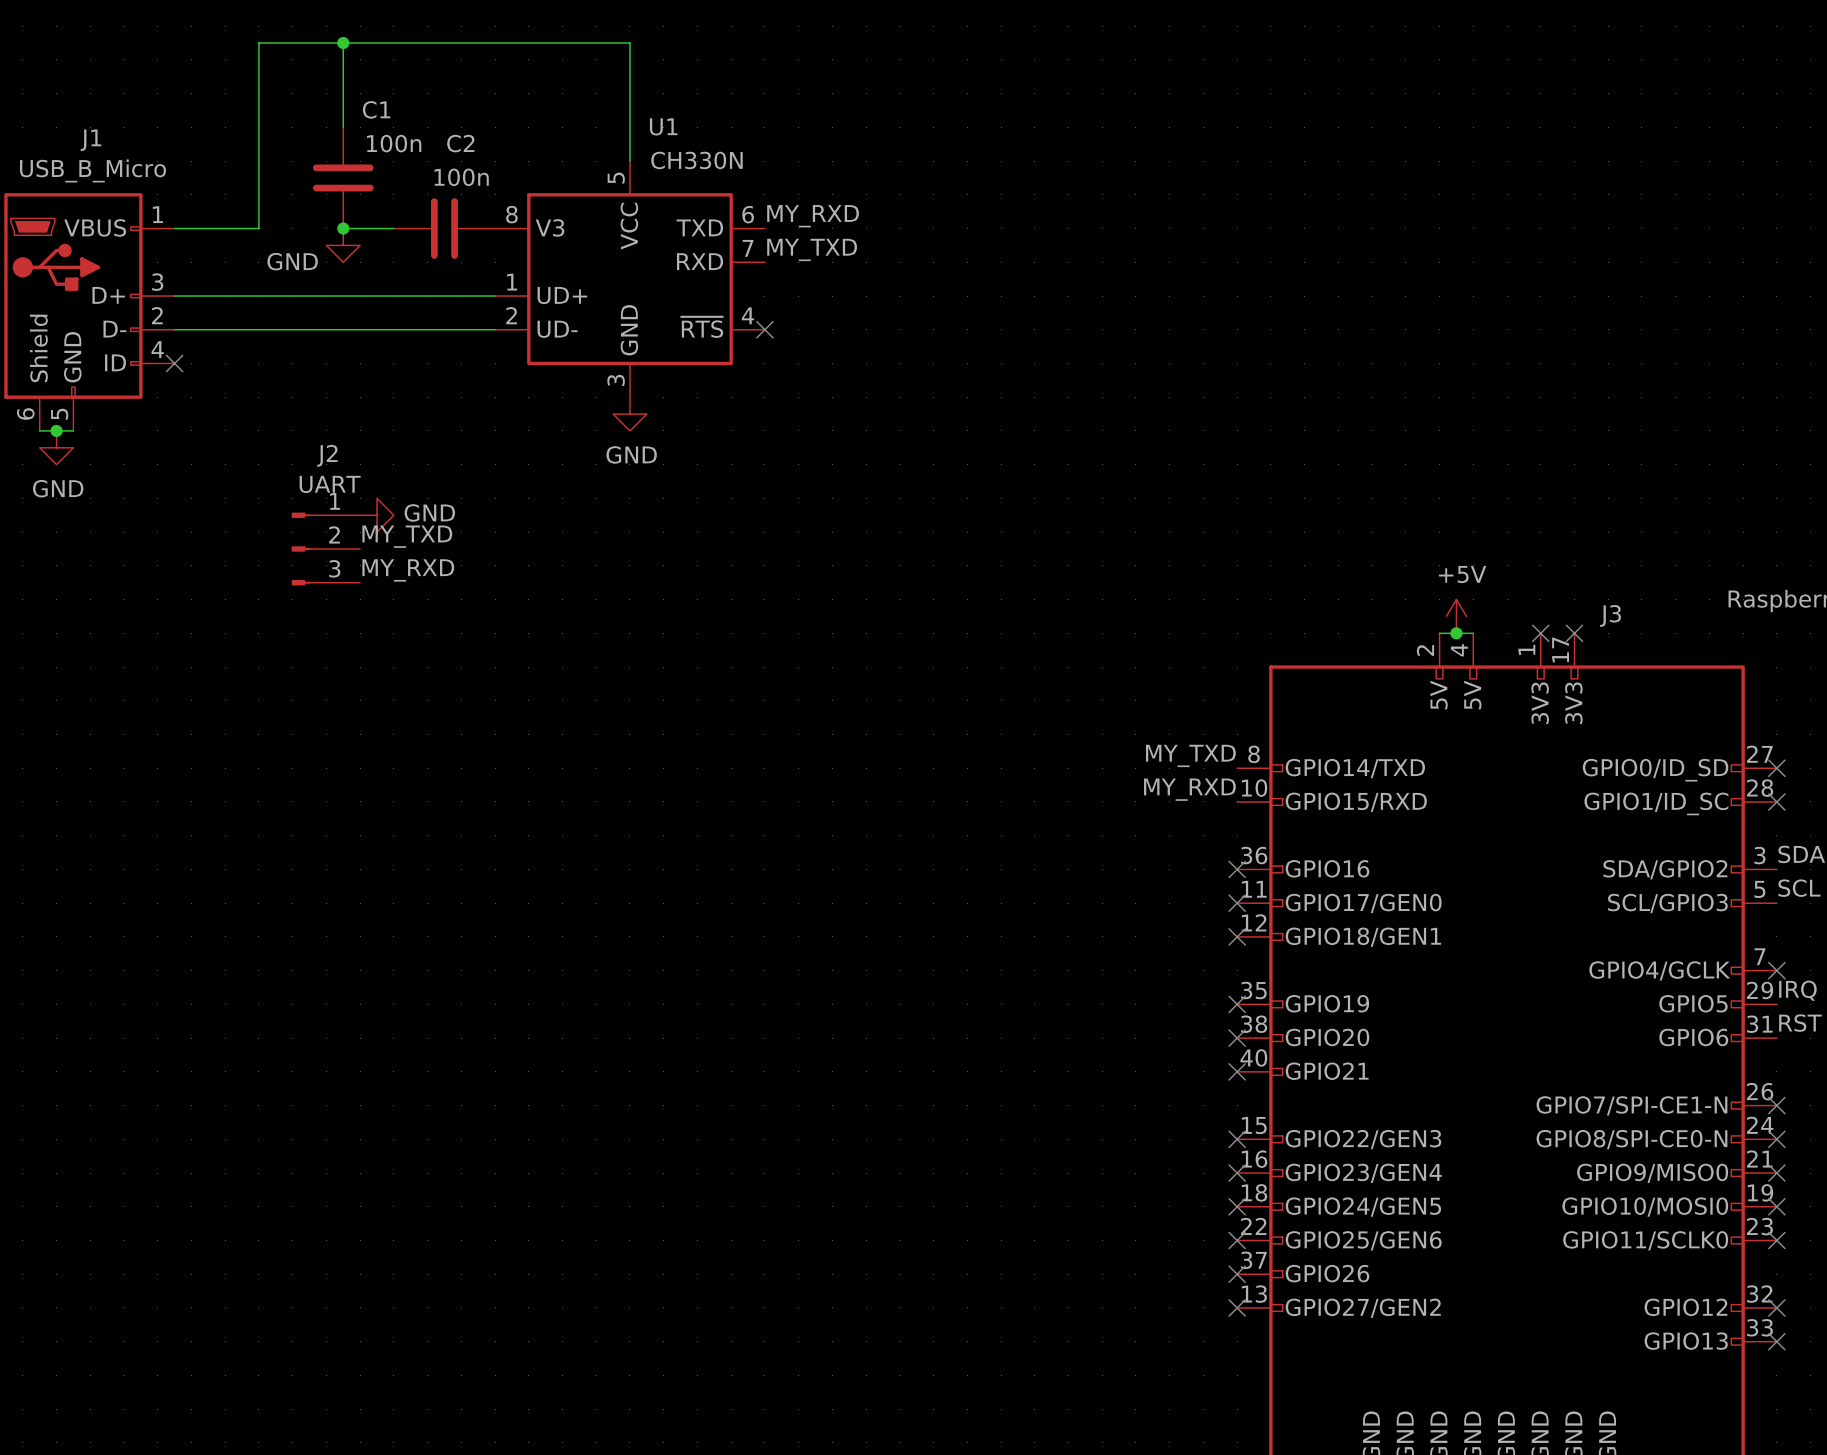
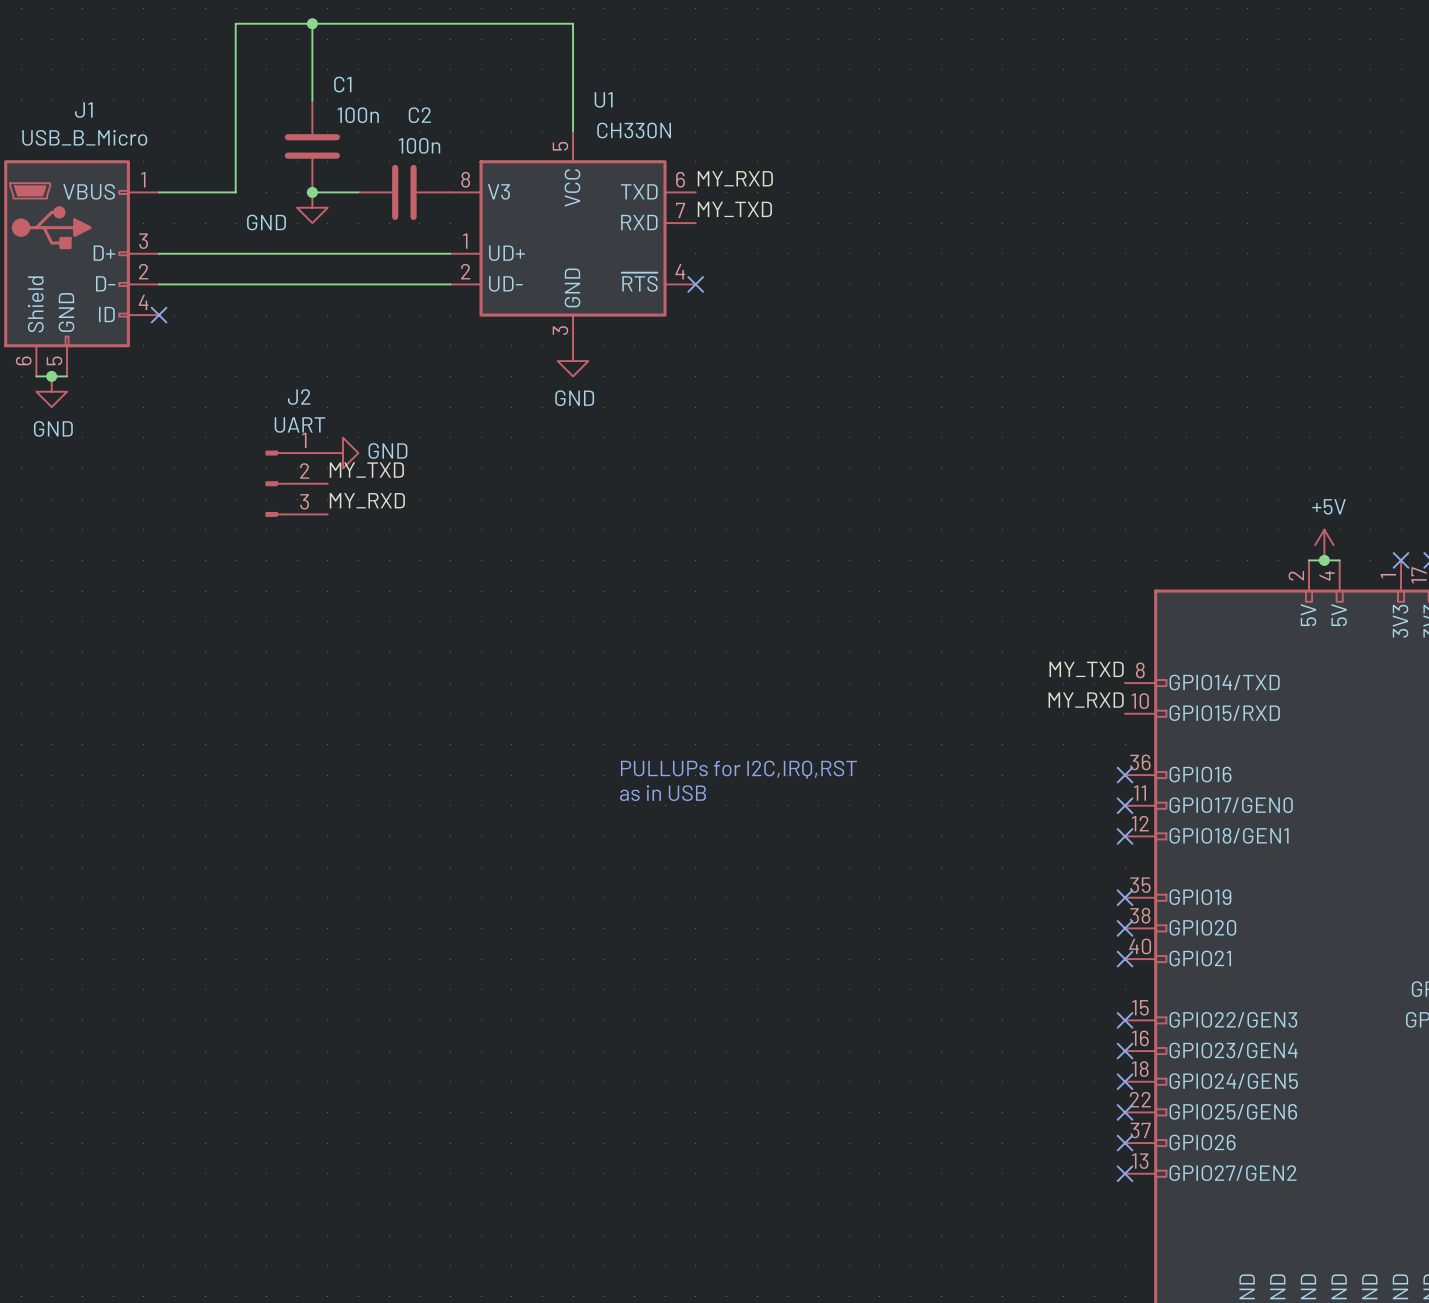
text: none -> PULLUPs for I2C,IRQ,RST (738, 769)
text: none -> as in USB (663, 793)

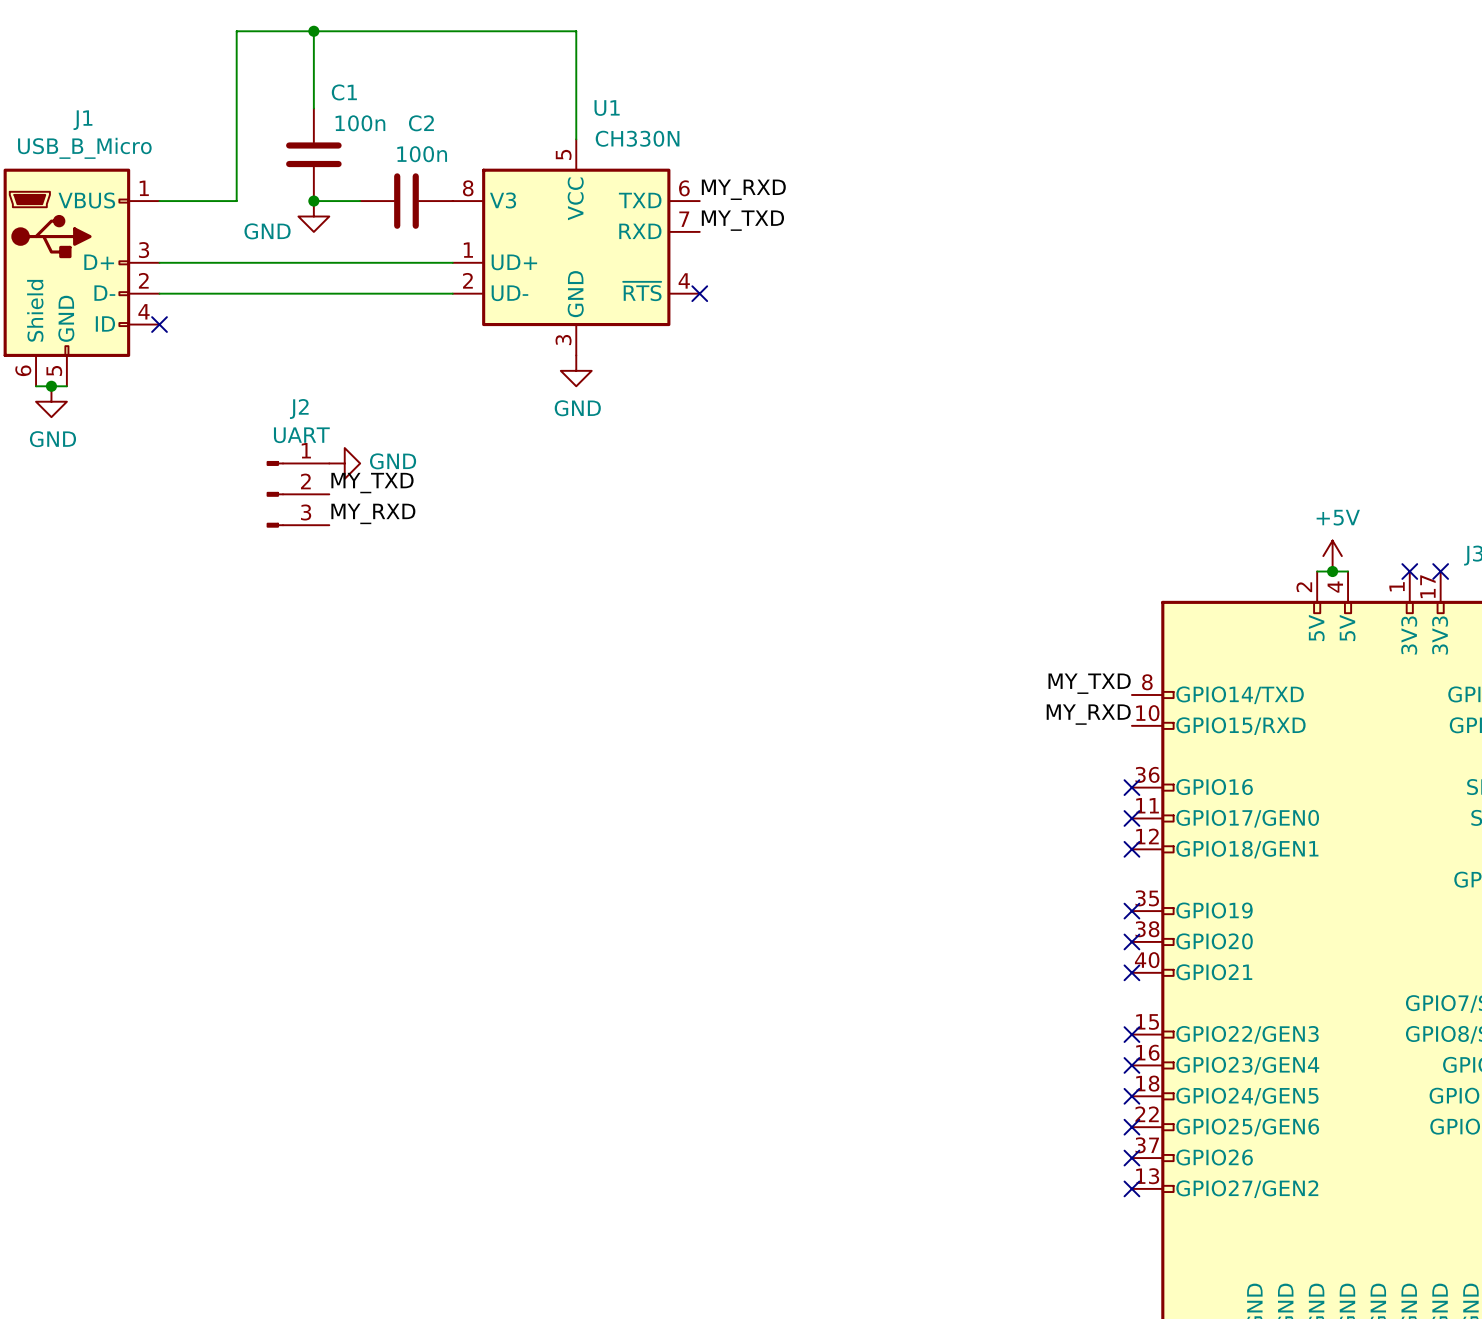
text: PULLUPs for I2C,IRQ,RST (738, 769) -> none
text: as in USB (663, 793) -> none

